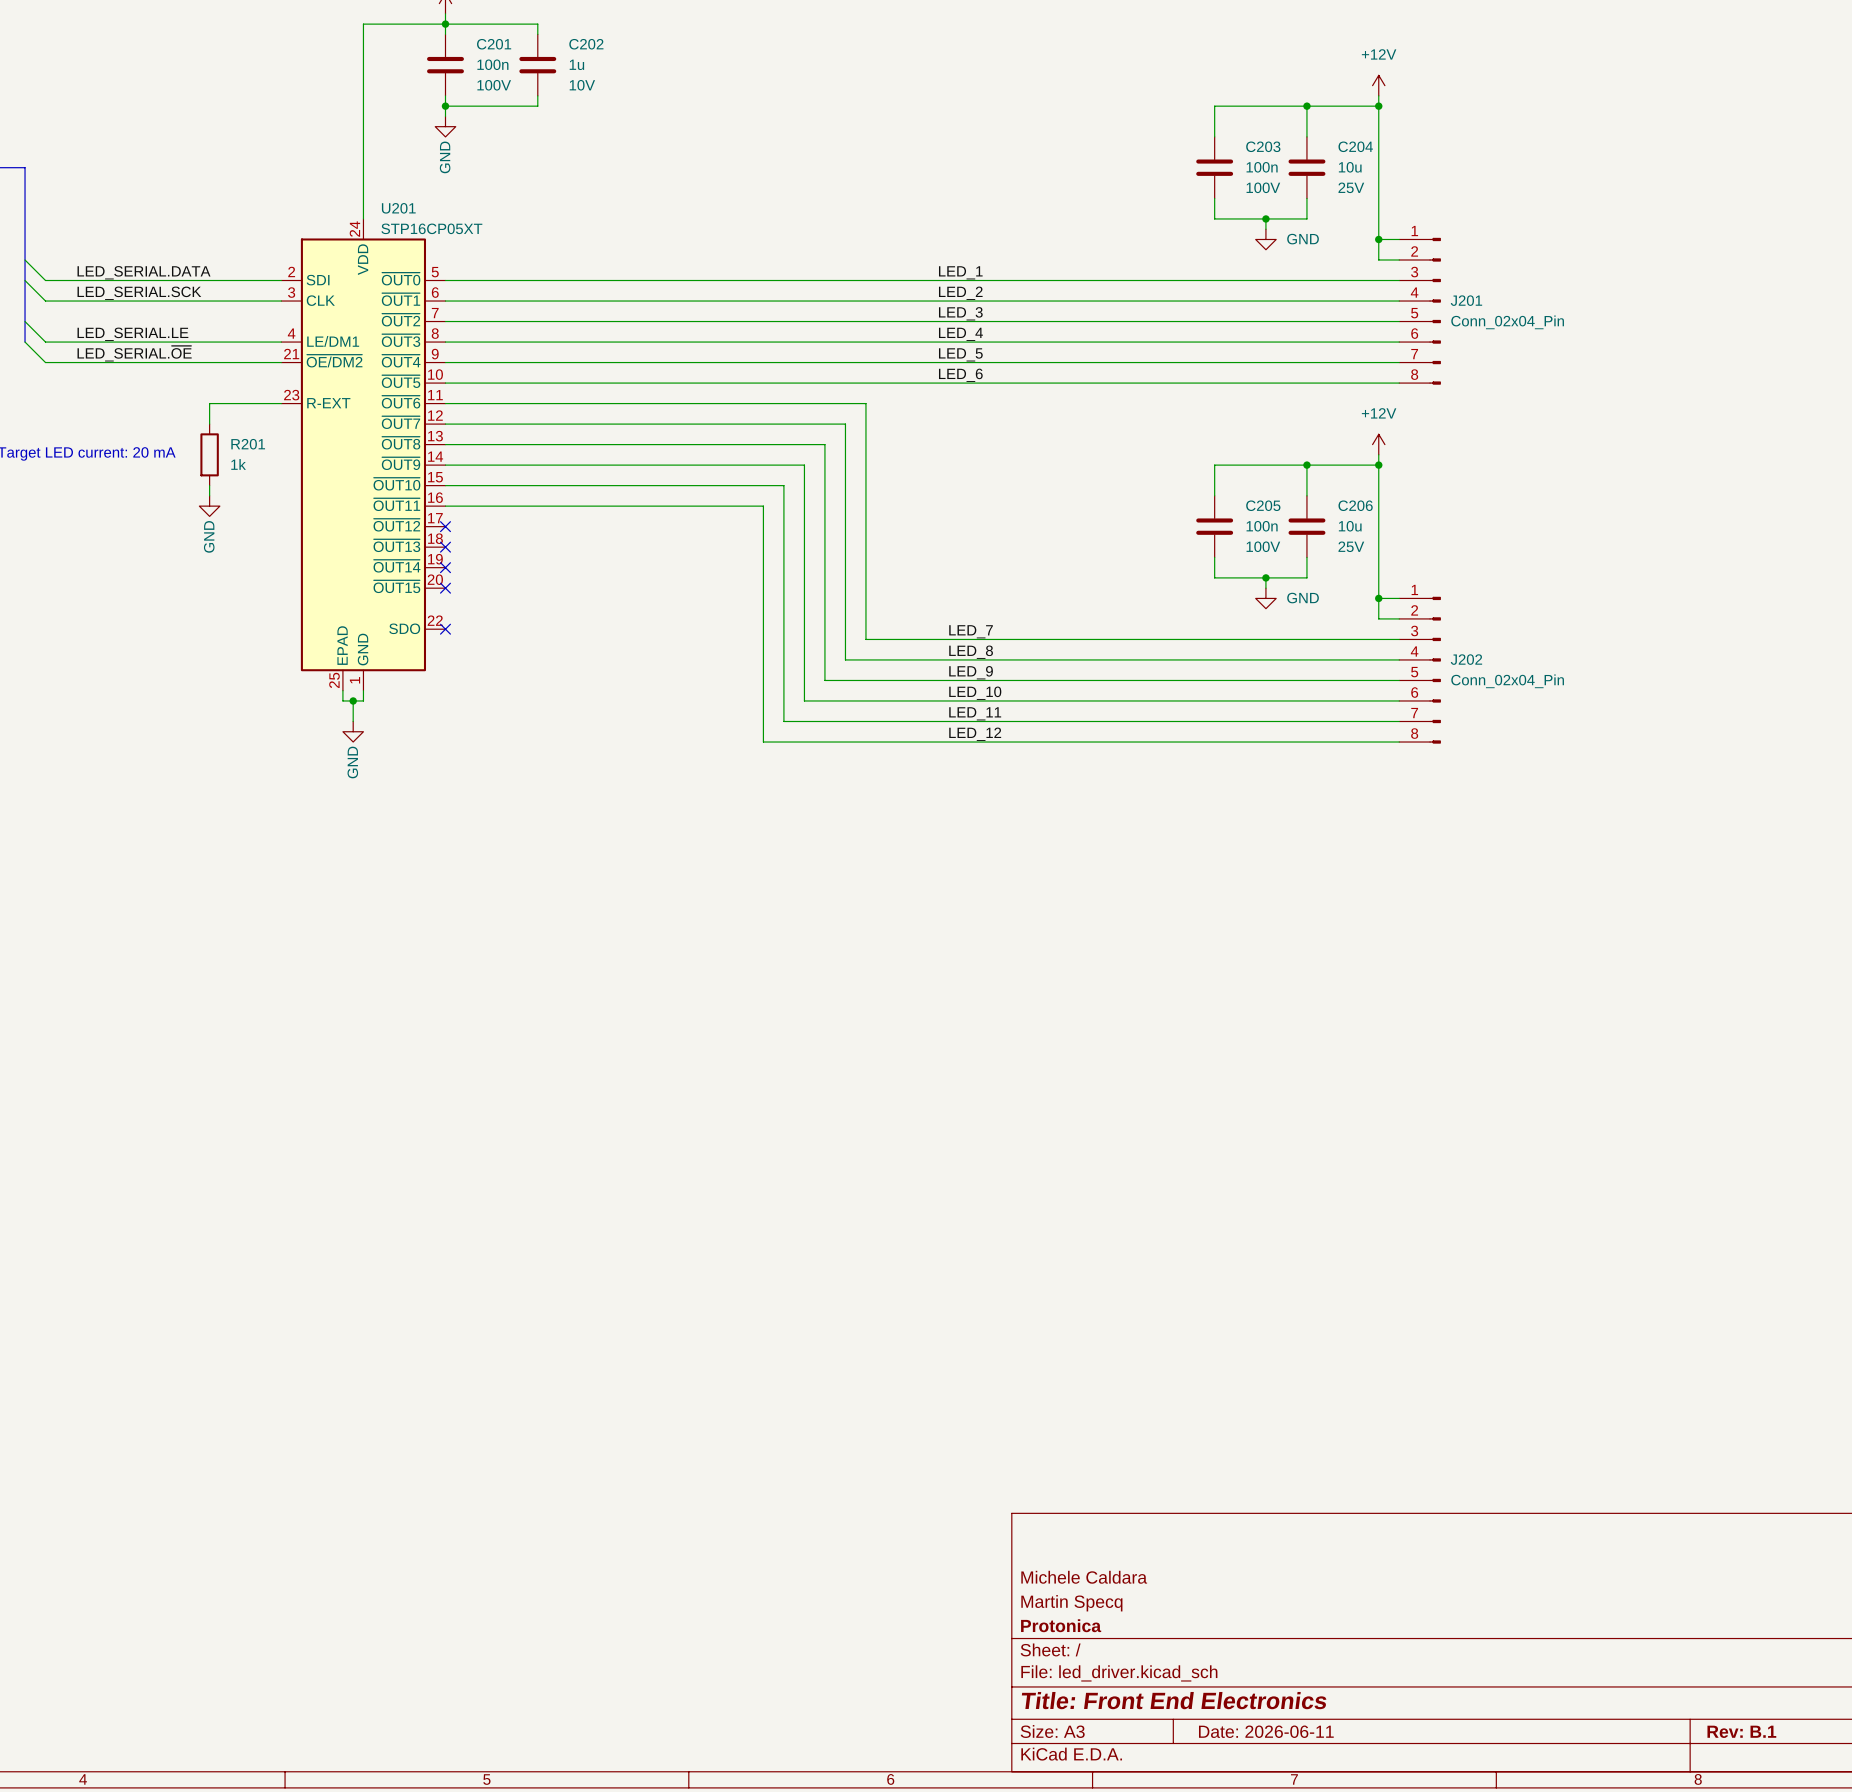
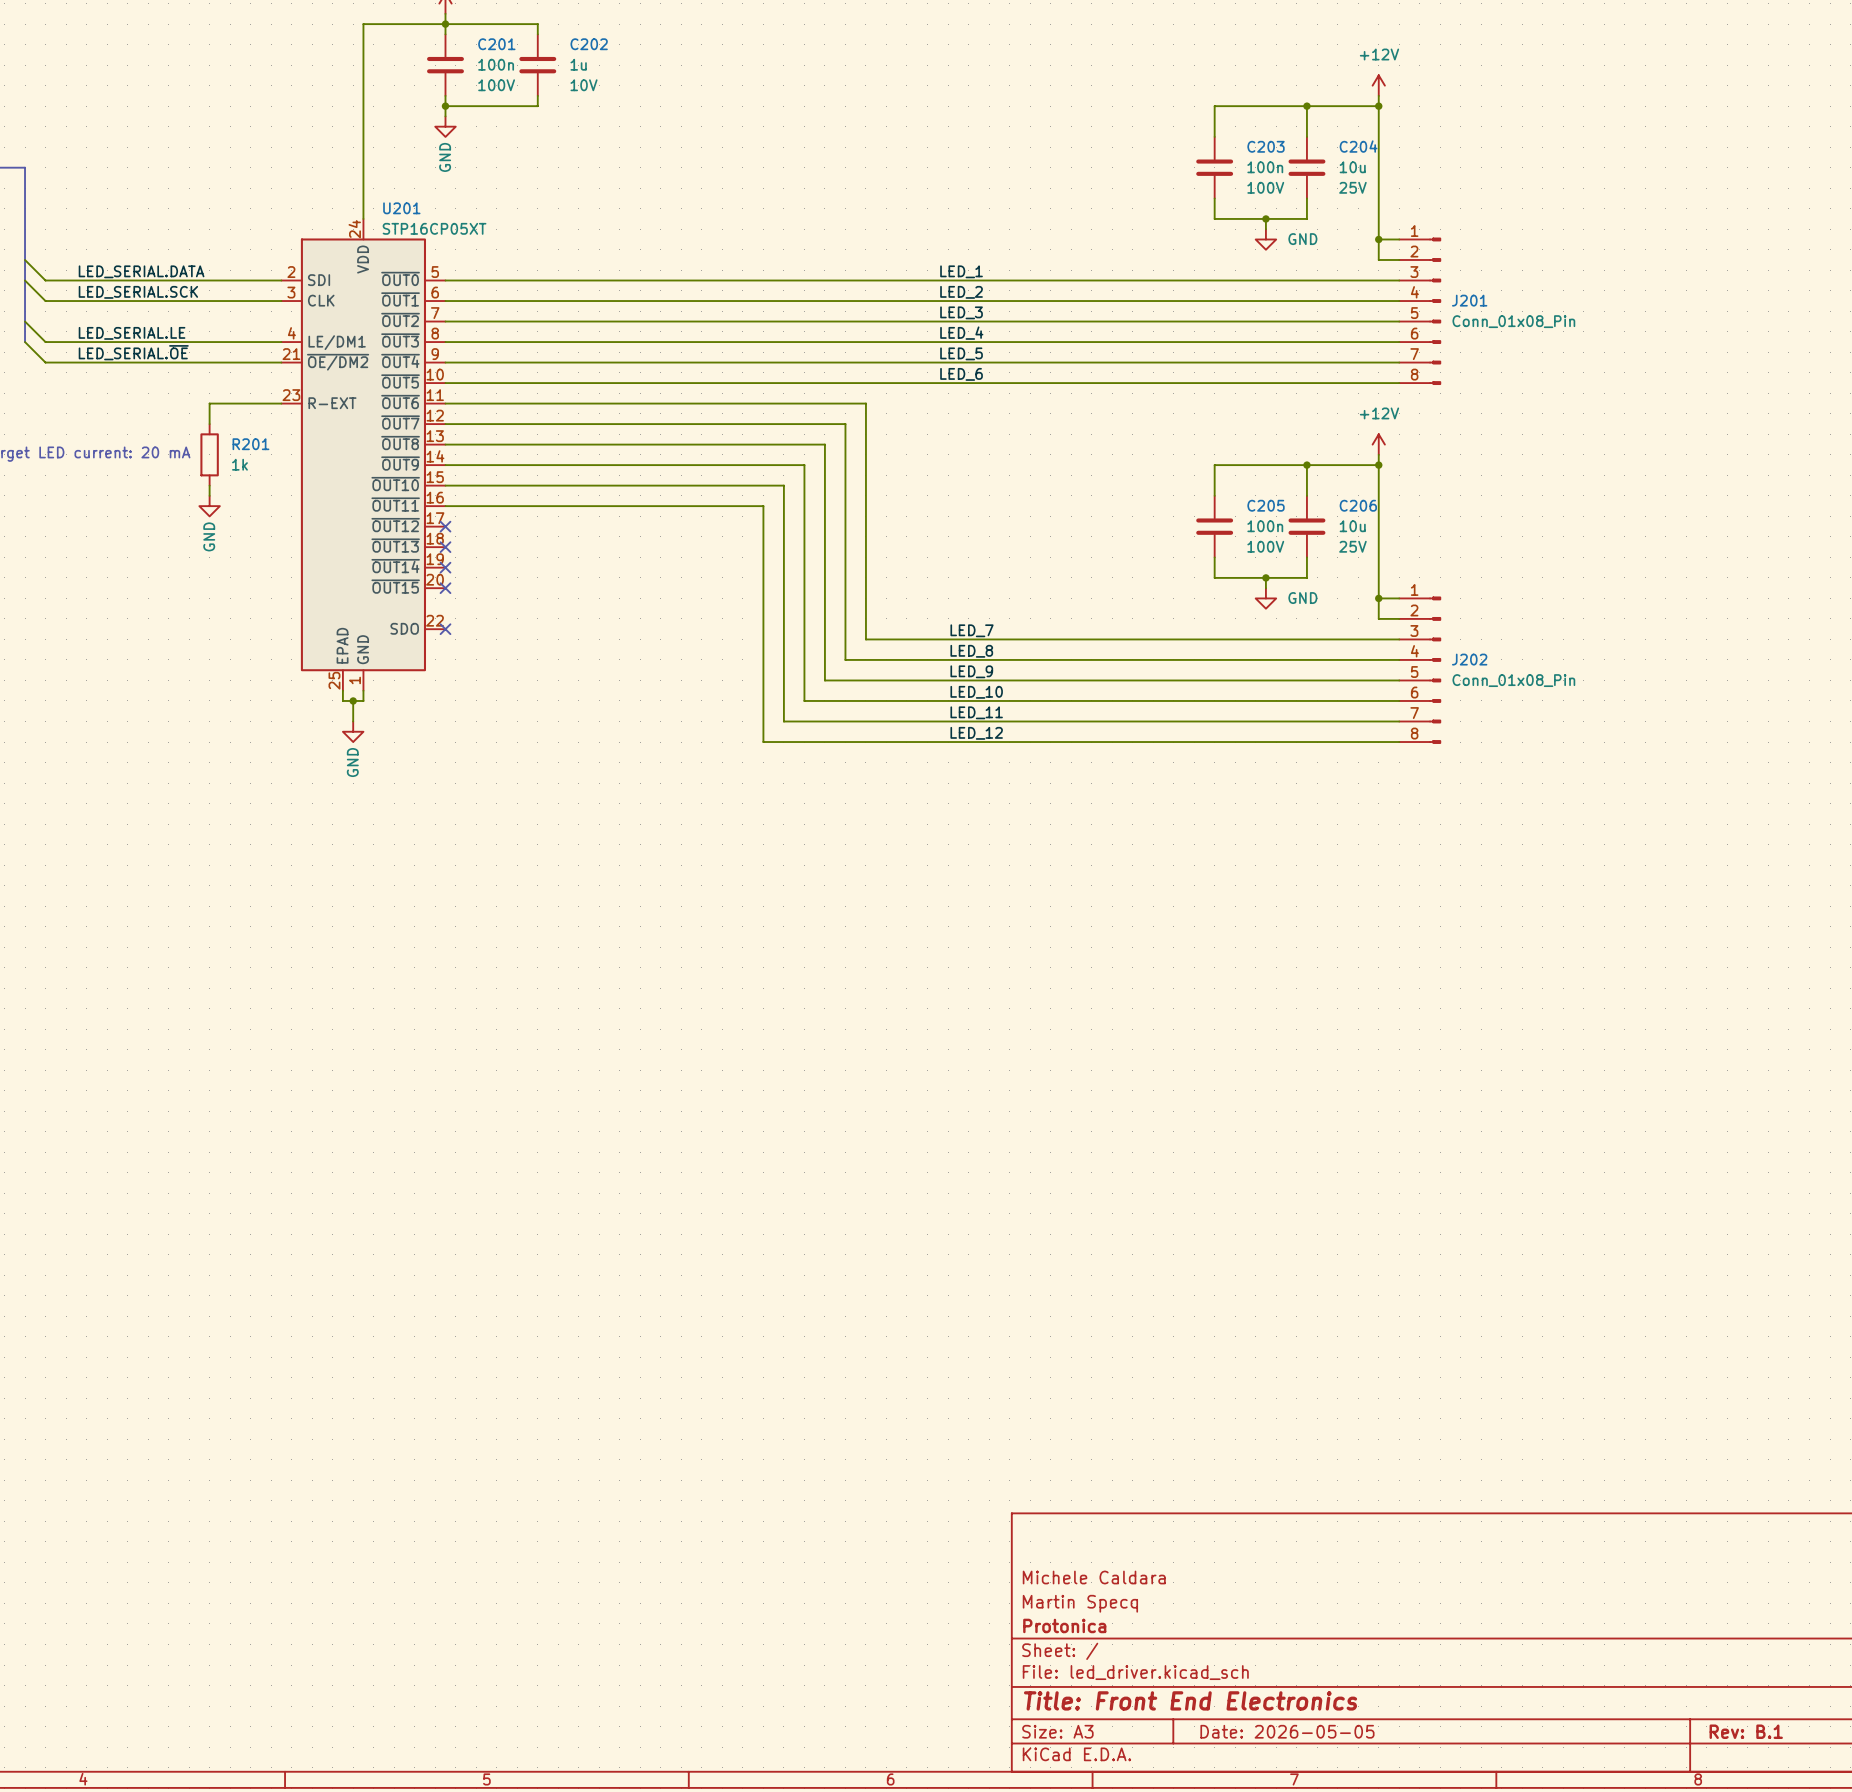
J201 value: Conn_02x04_Pin (1507, 322) -> Conn_01x08_Pin (1513, 321)
J202 value: Conn_02x04_Pin (1507, 681) -> Conn_01x08_Pin (1513, 680)
title block: Date: 2026-06-11 (1266, 1731) -> Date: 2026-05-05 (1287, 1731)

